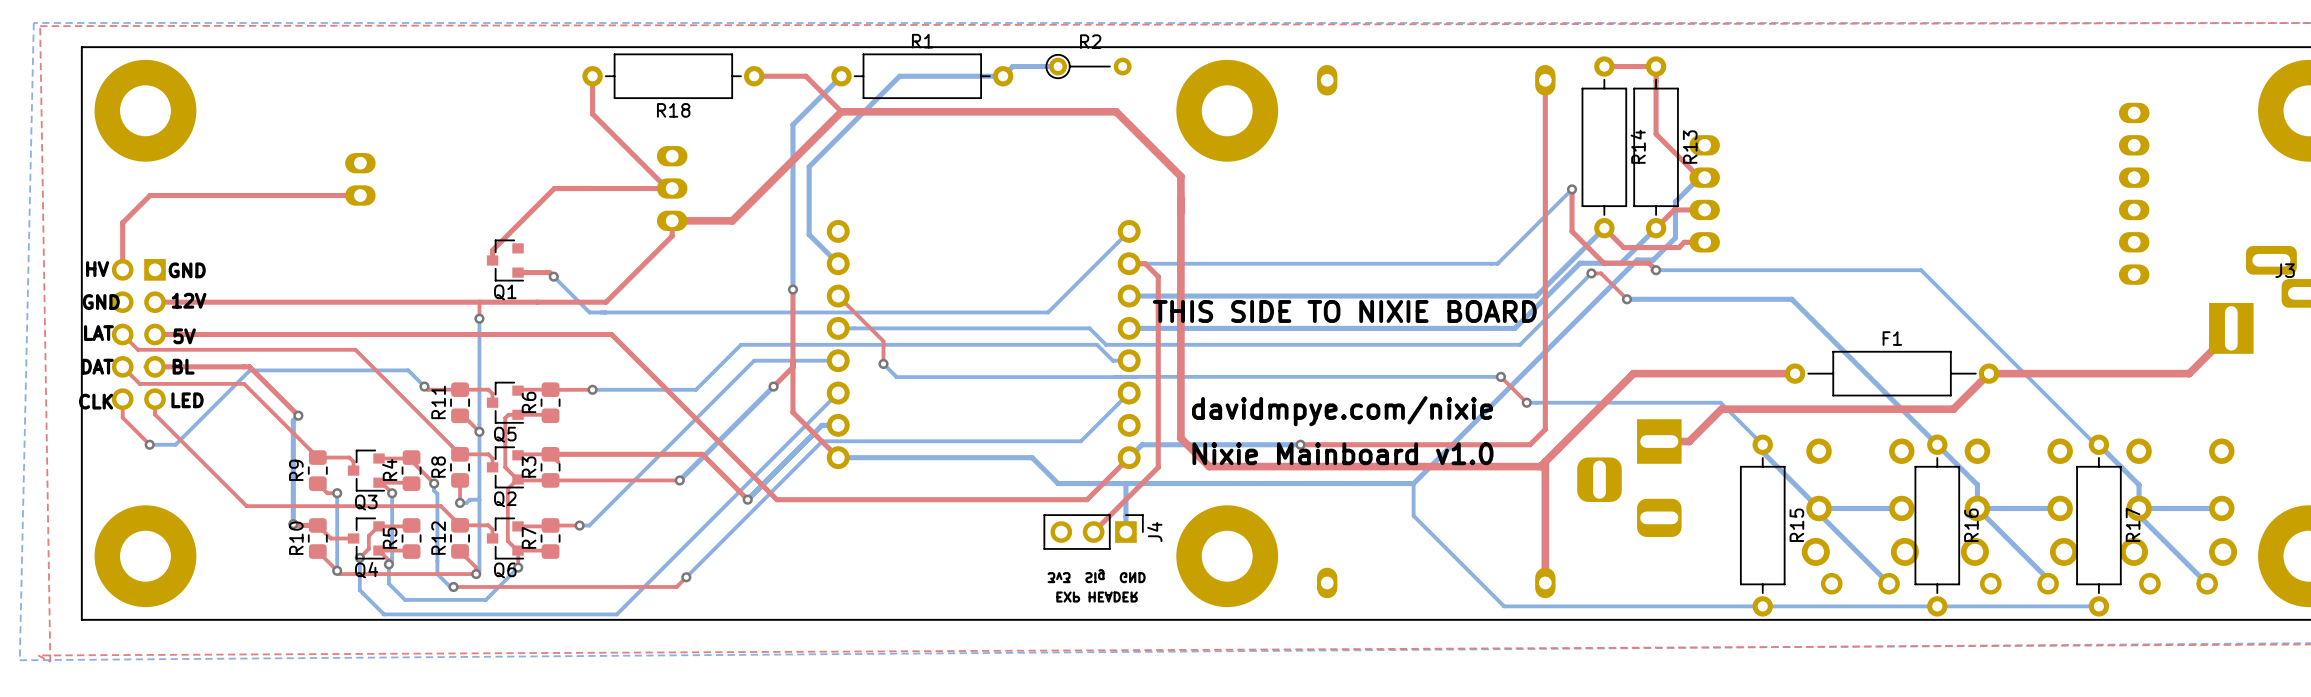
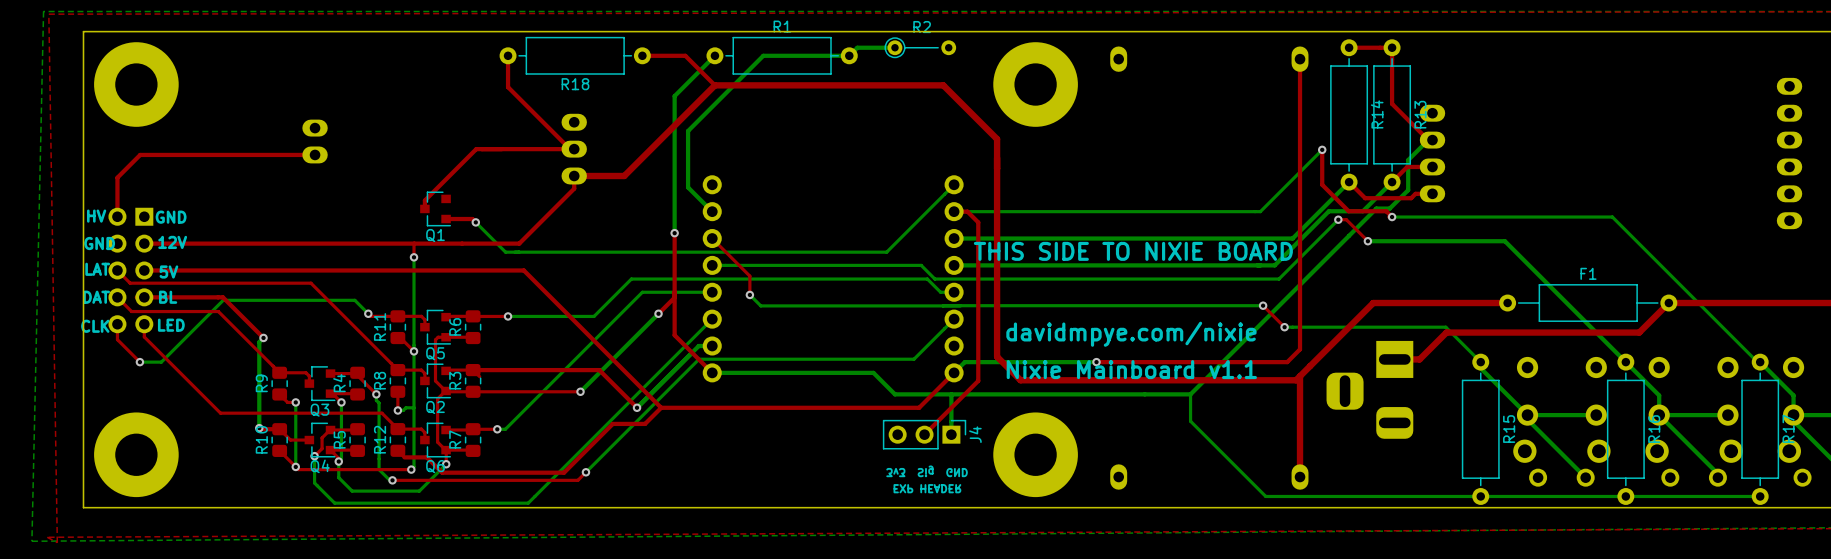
text: Nixie Mainboard v1.0 (1342, 453) -> Nixie Mainboard v1.1 (1131, 369)
top track: (467, 559) (476, 567) (476, 574) -> (404, 457) (426, 457) (442, 472) (564, 472) (612, 423) (645, 423) (661, 407)

